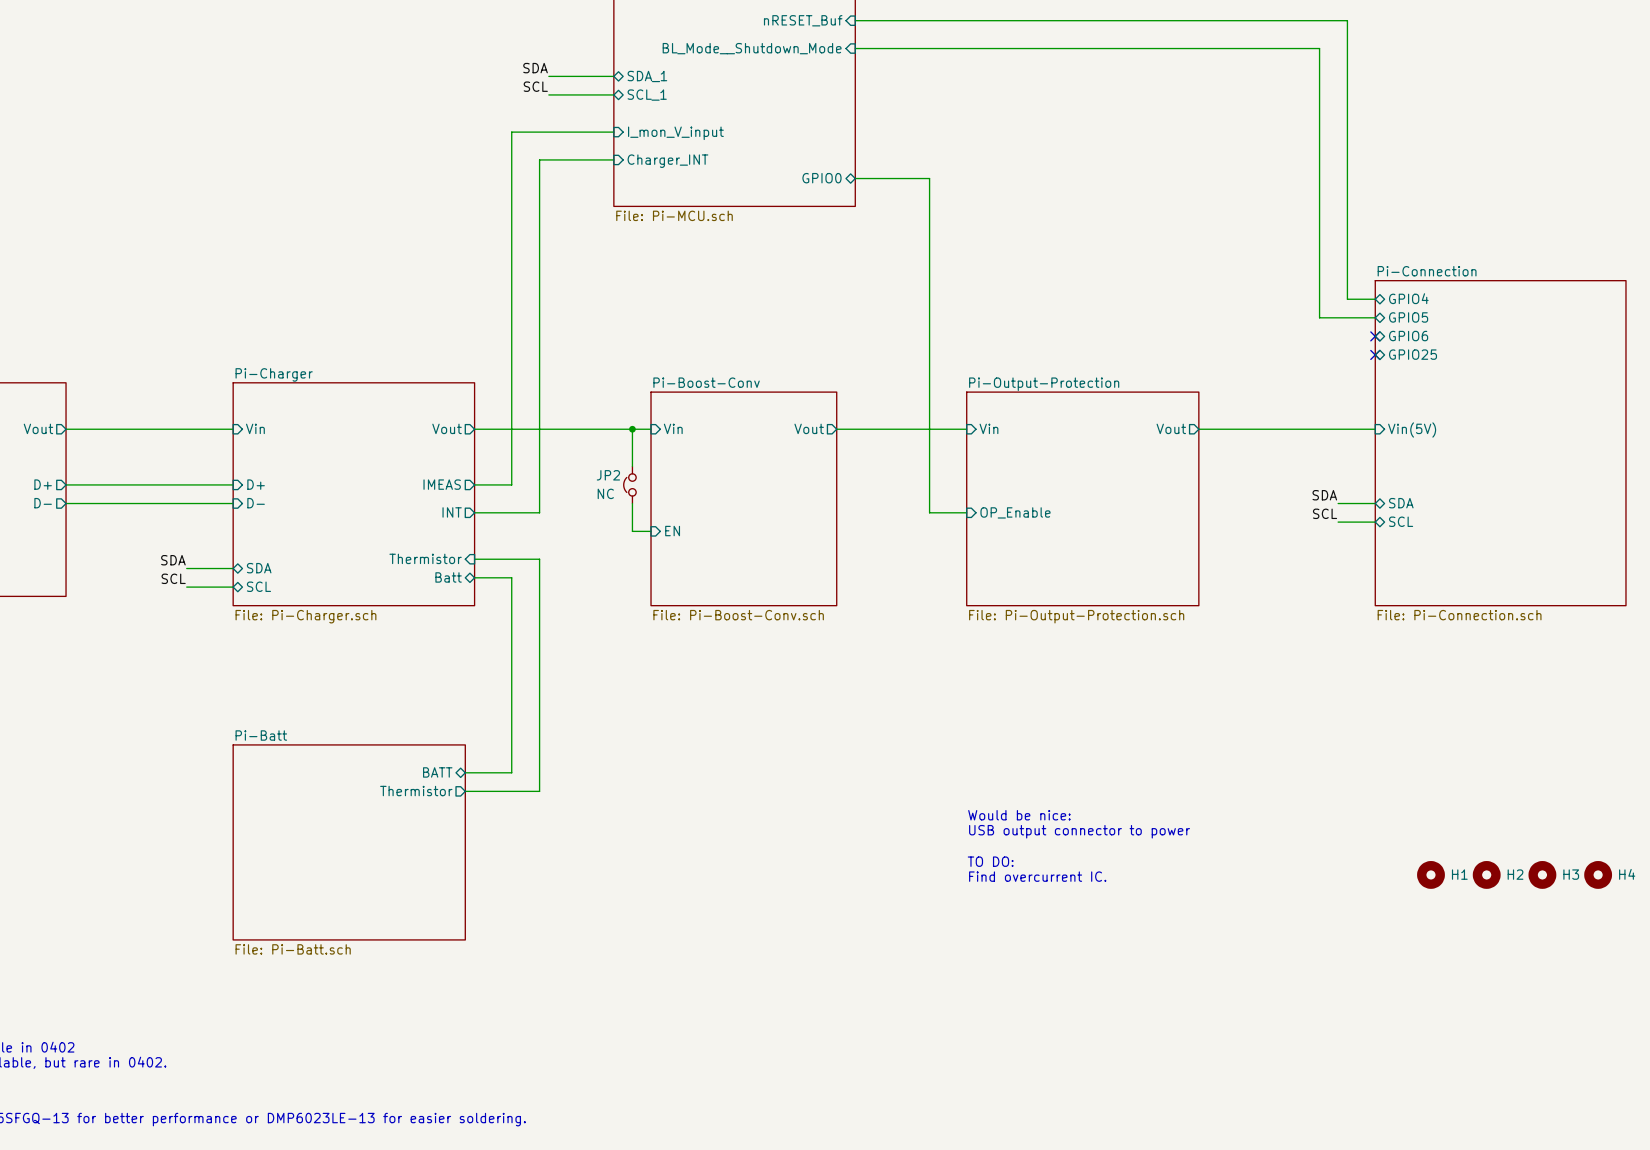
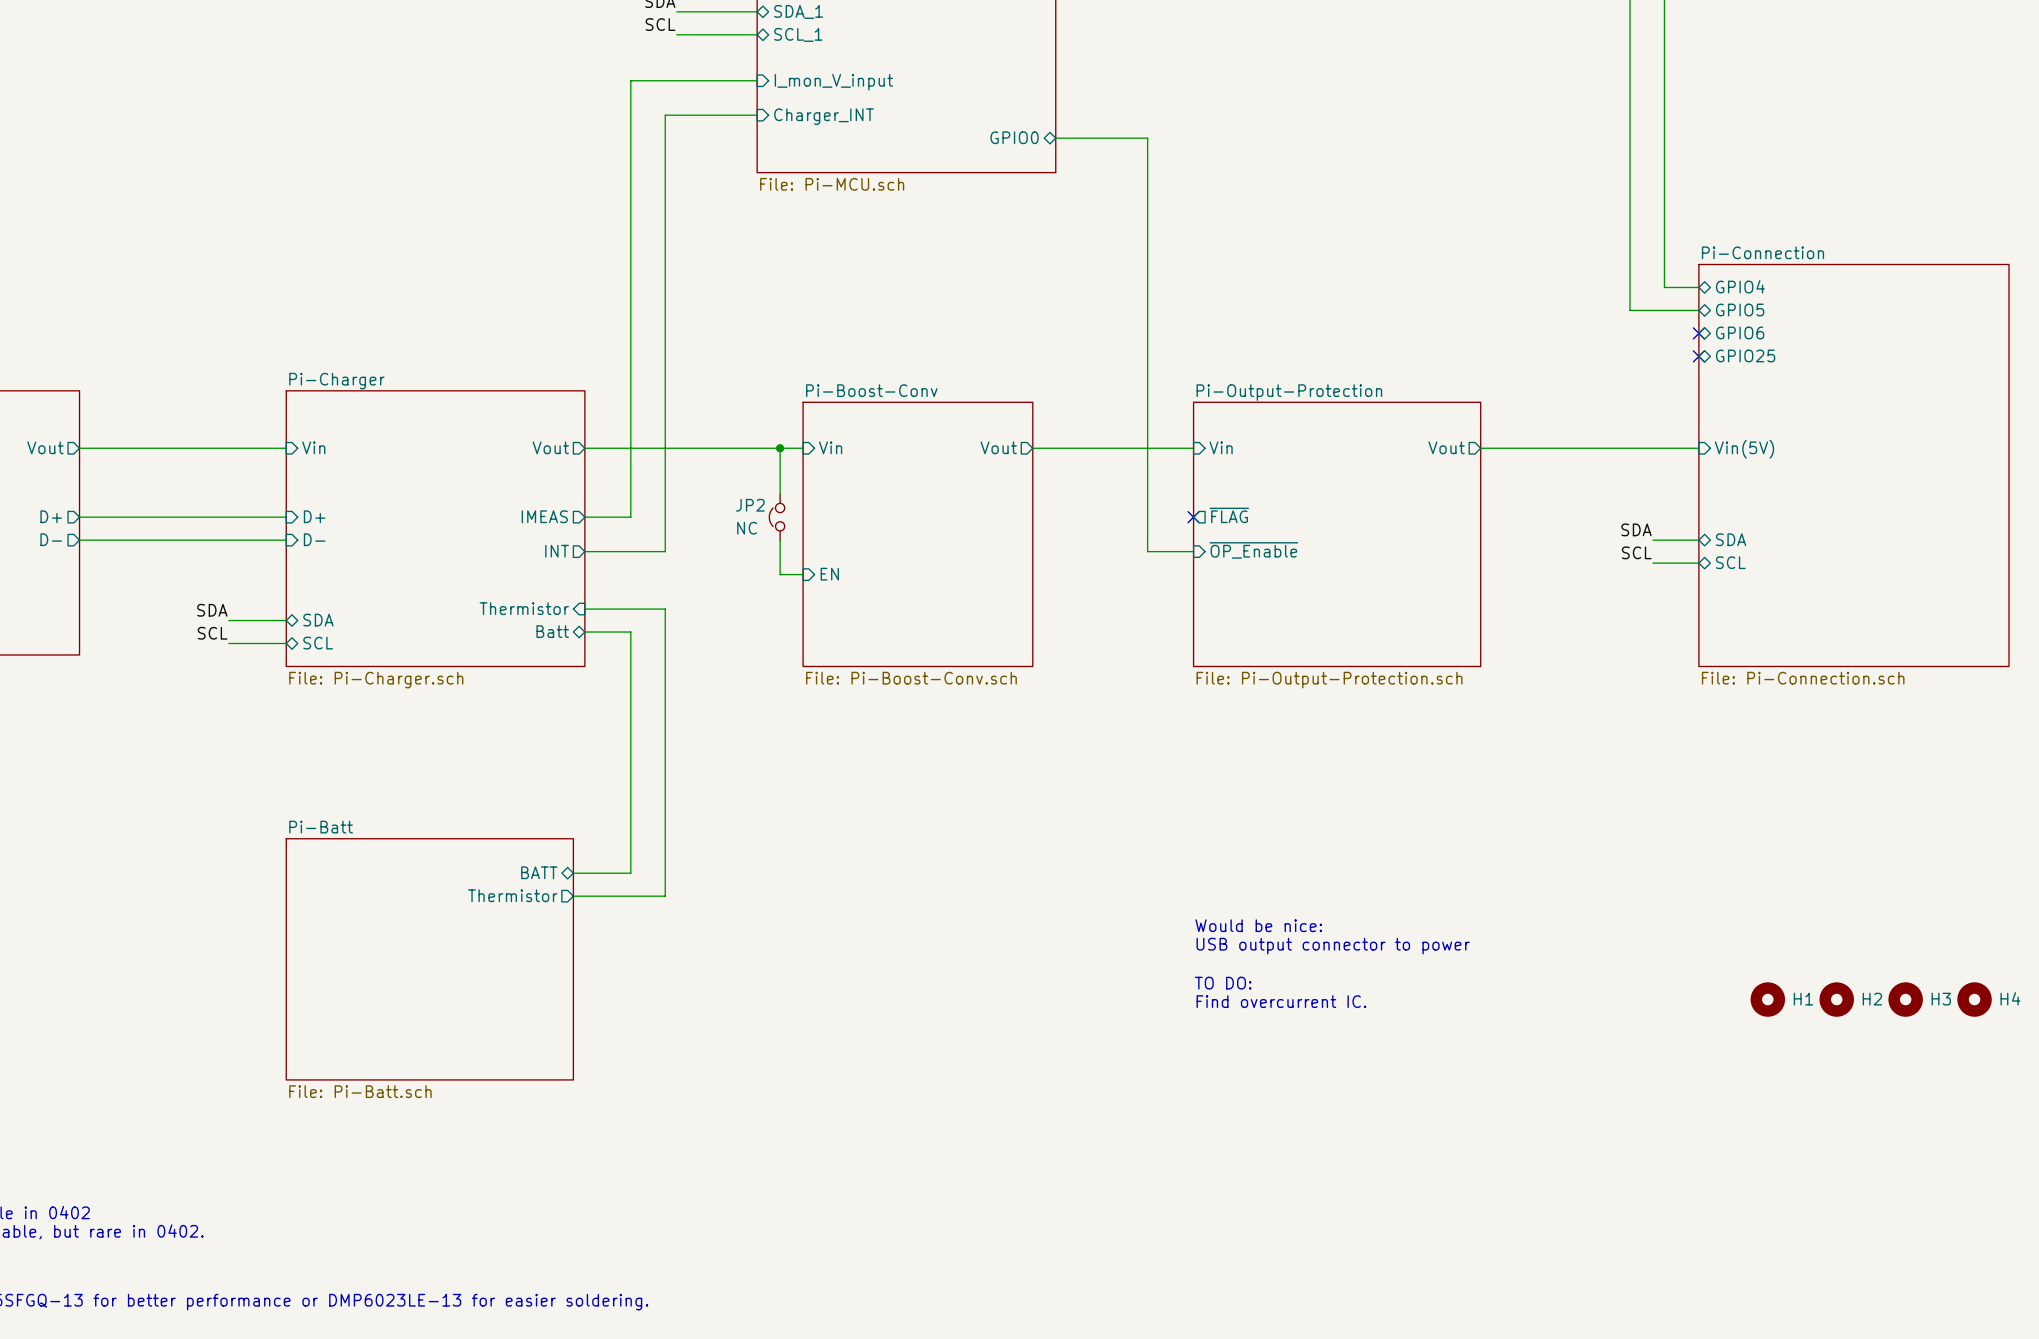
sheet pin: none -> ~{FLAG} (1229, 515)
no-connect mark: none -> (1193, 517)
sheet pin: OP_Enable (1015, 512) -> ~{OP_Enable} (1253, 550)

